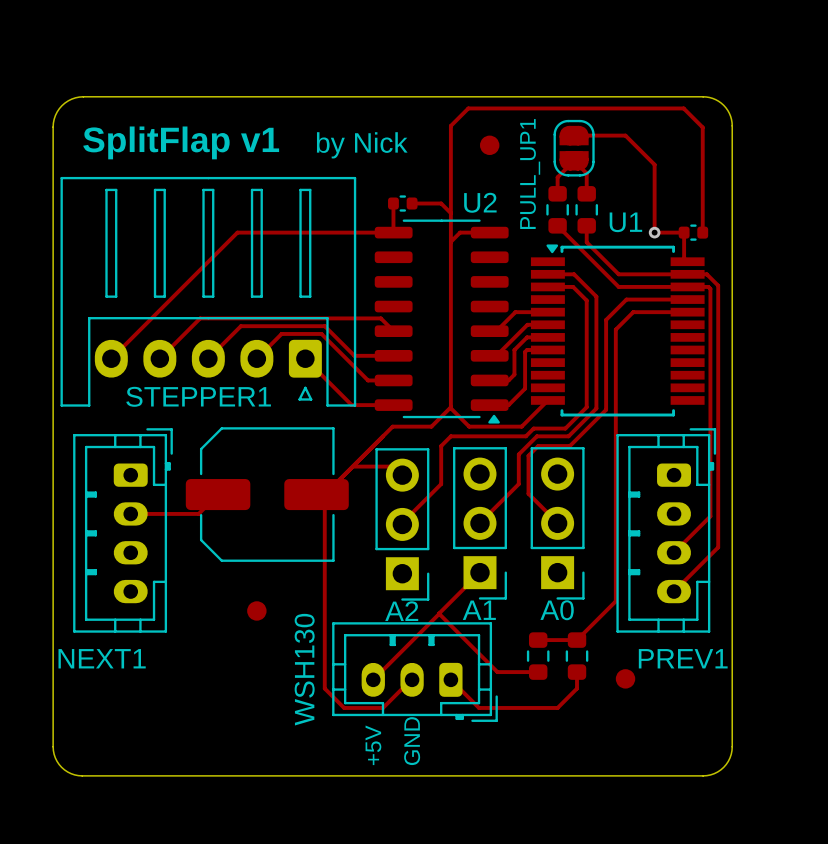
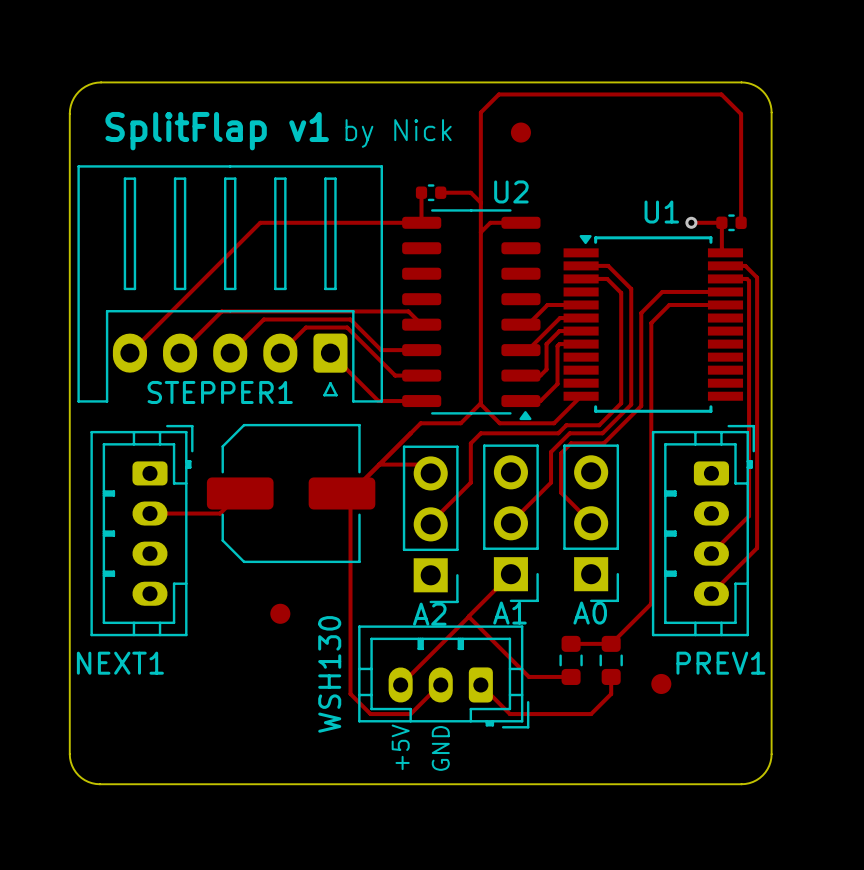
track: (574, 135) (625, 135) (654, 164) (654, 232) -> none
PULL_UP1: (574, 148) -> none
track: (557, 193) (557, 177) (574, 160) (586, 173) (586, 193) -> none
part: (557, 209) -> none
part: (586, 209) -> none
track: (557, 225) (618, 286) (687, 286) -> none
track: (586, 225) (586, 242) (618, 274) (687, 274) -> none

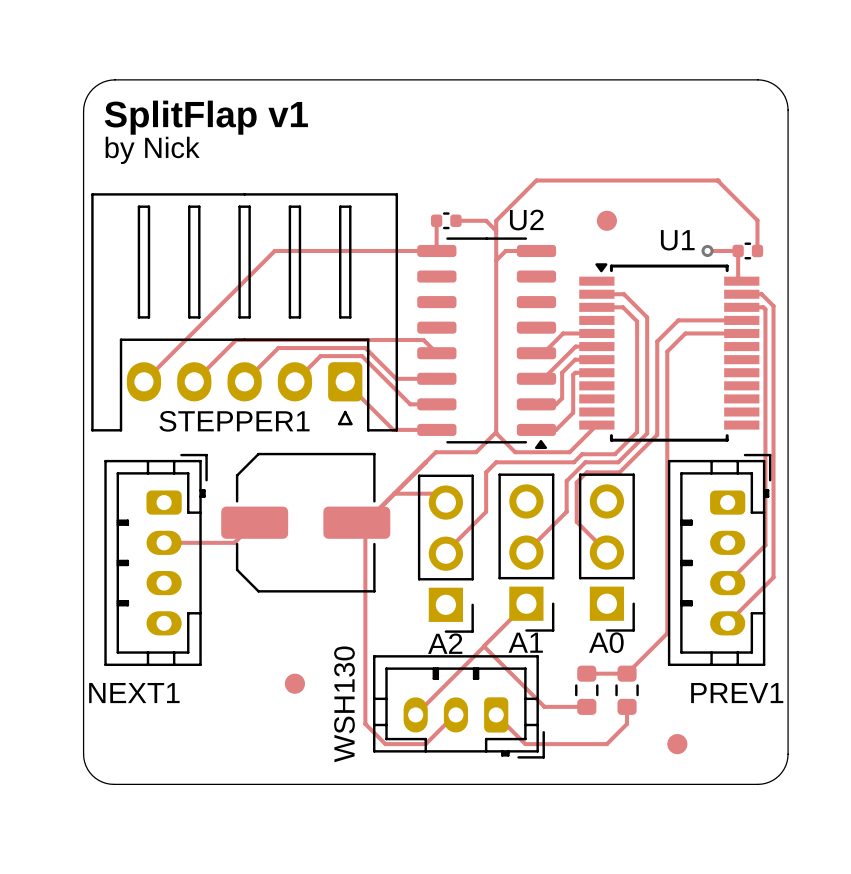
text: none -> SplitFlap v1 (206, 117)
board edge: (771, 112) (768, 99) (762, 91) (751, 84) (741, 82) (101, 82) (89, 84) (78, 91) (72, 101) (69, 113) -> (788, 140) (787, 106) (785, 96) (773, 84) (761, 80) (114, 79) (99, 84) (87, 95) (83, 107) (83, 141)
text: SplitFlap v1 (217, 131) -> by Nick (152, 150)
part position: (520, 132) -> (606, 220)
text: by Nick (398, 133) -> none
track: none -> (717, 180) (757, 220)
track: (741, 192) (741, 114) (721, 94) (498, 94) (480, 112) (480, 192) -> (718, 180) (536, 180) (496, 220)
part position: (280, 613) -> (294, 683)
part position: (661, 683) -> (677, 744)
board edge: (69, 724) (70, 758) (73, 769) (84, 780) (99, 784) (745, 783) (759, 778) (769, 765) (771, 754) (771, 724) -> (83, 754) (85, 765) (92, 775) (102, 782) (113, 784) (757, 784) (769, 782) (779, 775) (785, 765) (788, 754)
text: +5V (400, 747) -> none
text: GND (440, 748) -> none

